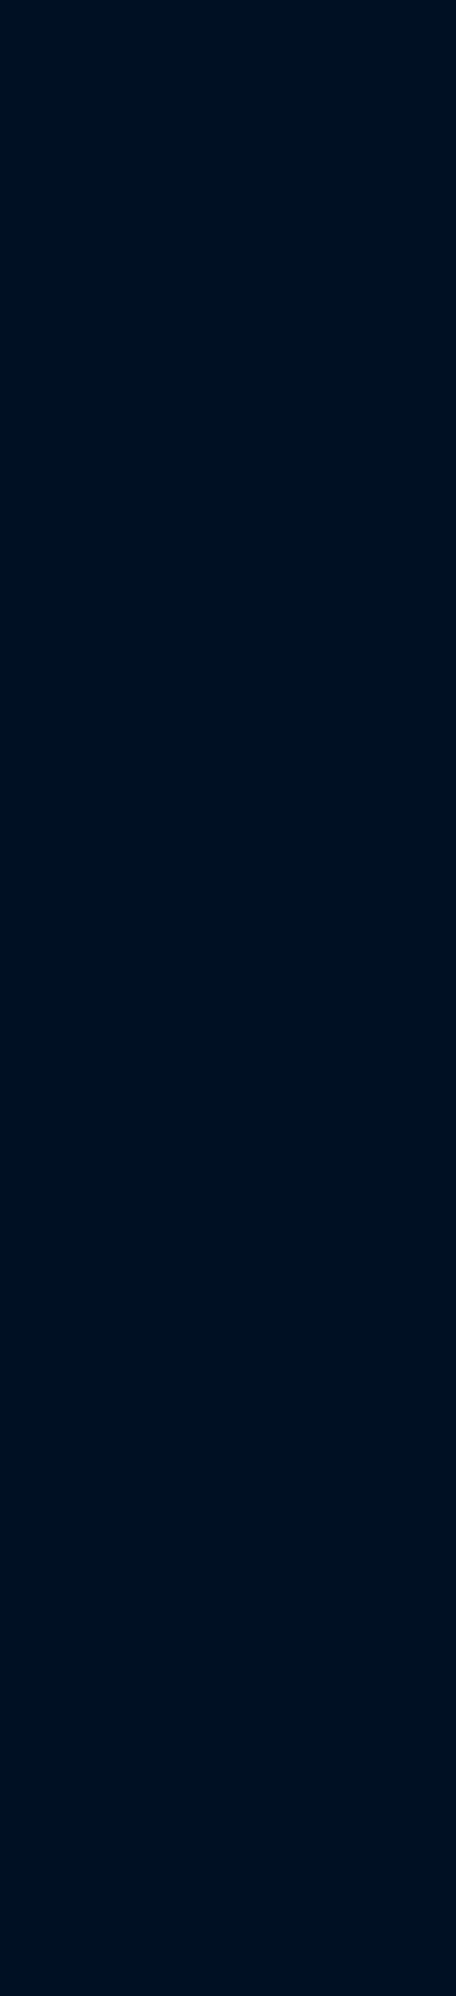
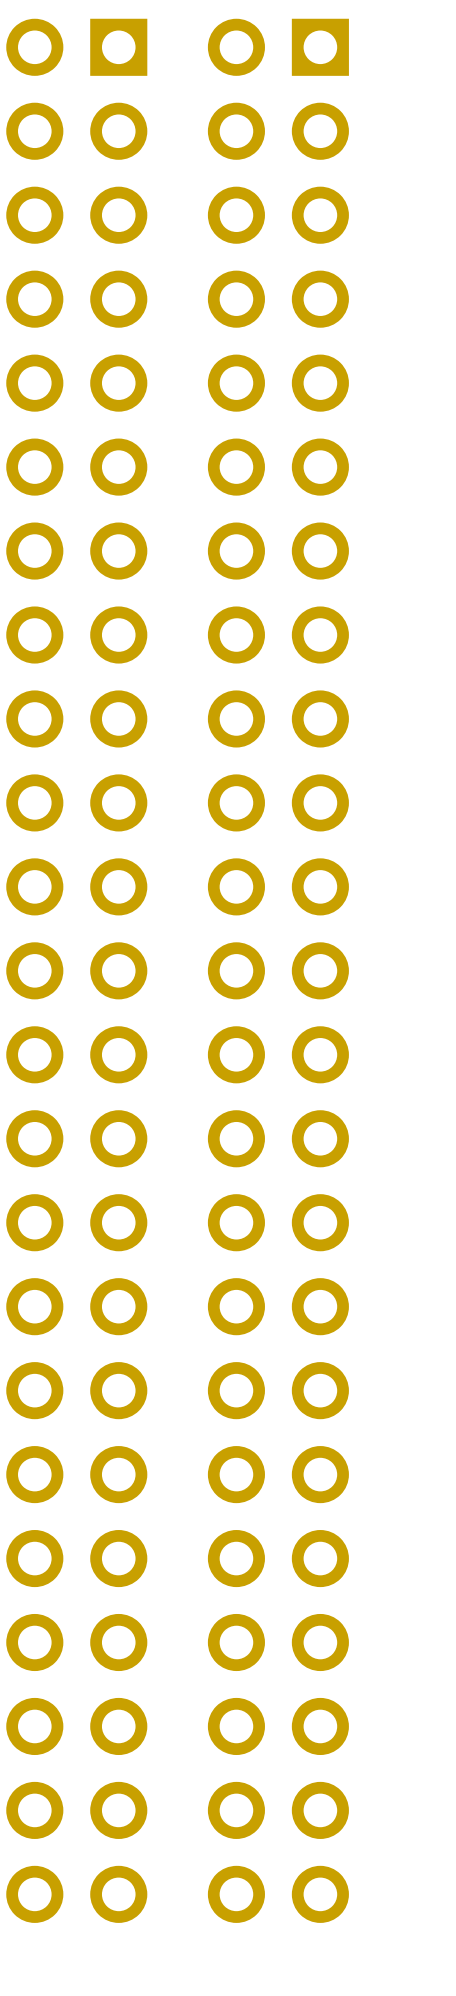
part: none -> (76, 970)
part: none -> (278, 970)

